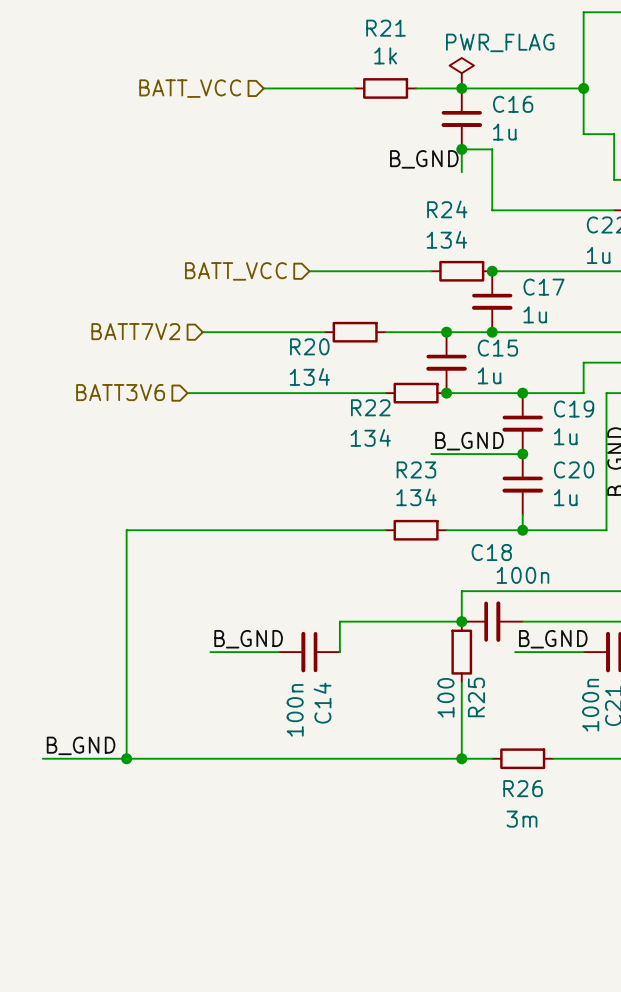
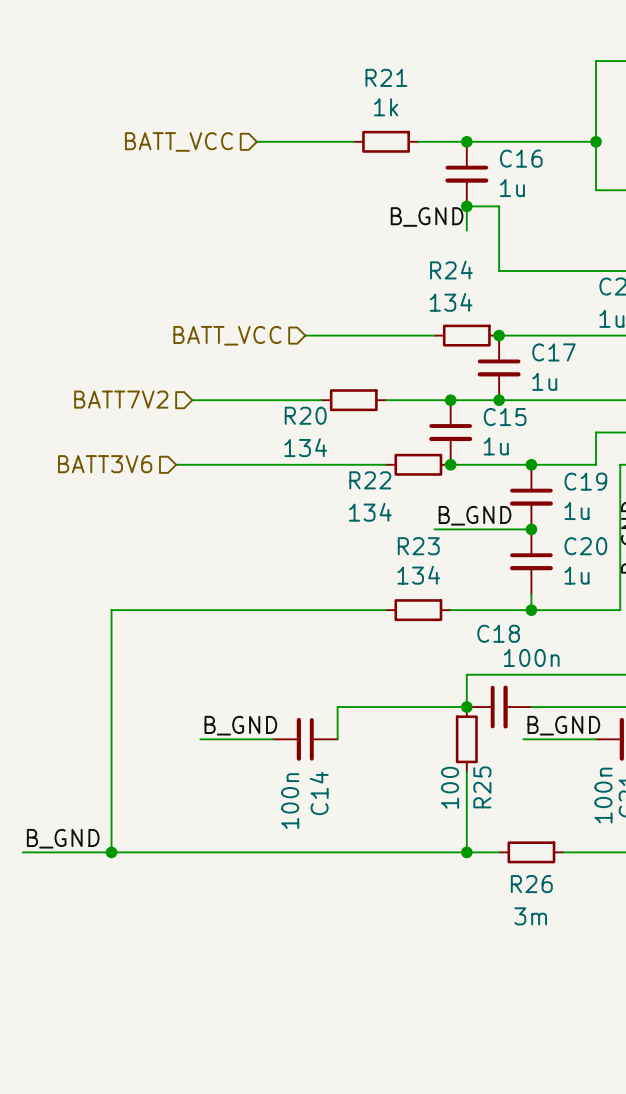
power symbol: PWR_FLAG (461, 73) -> none

